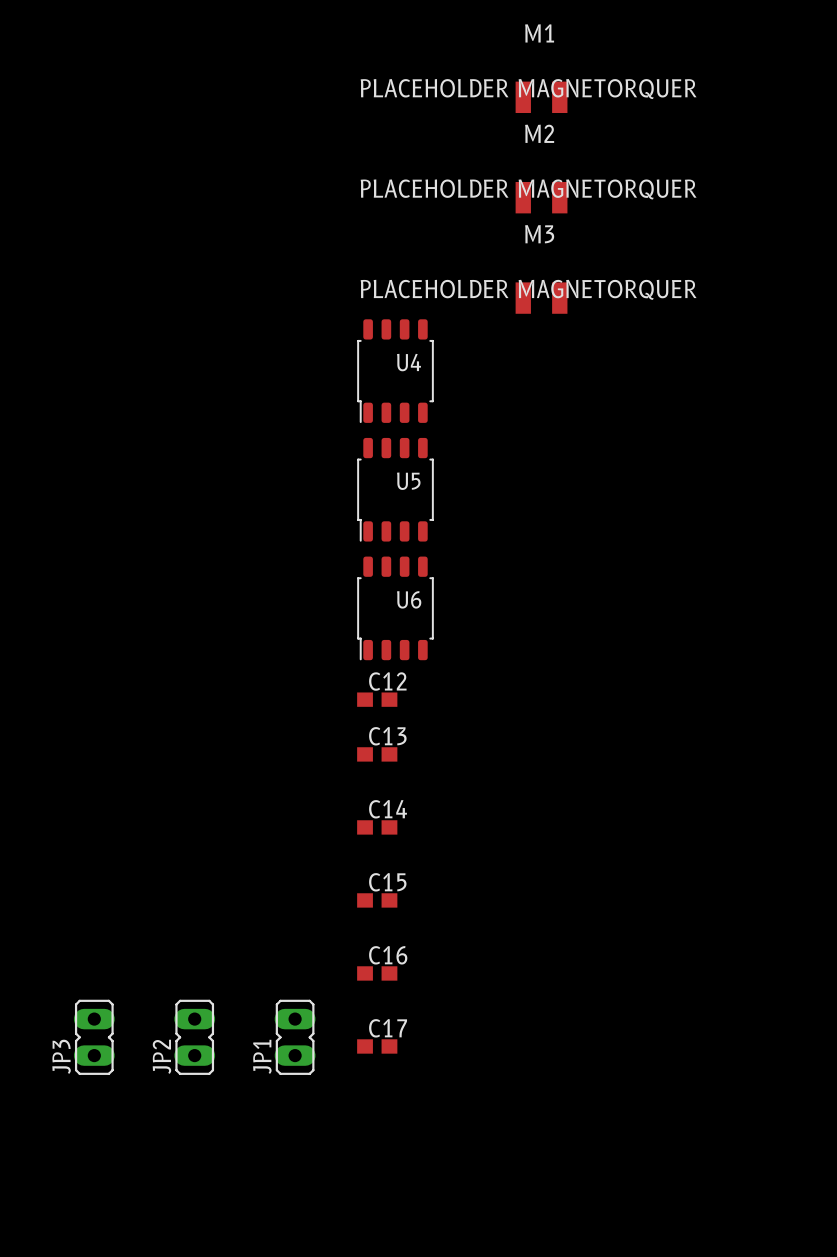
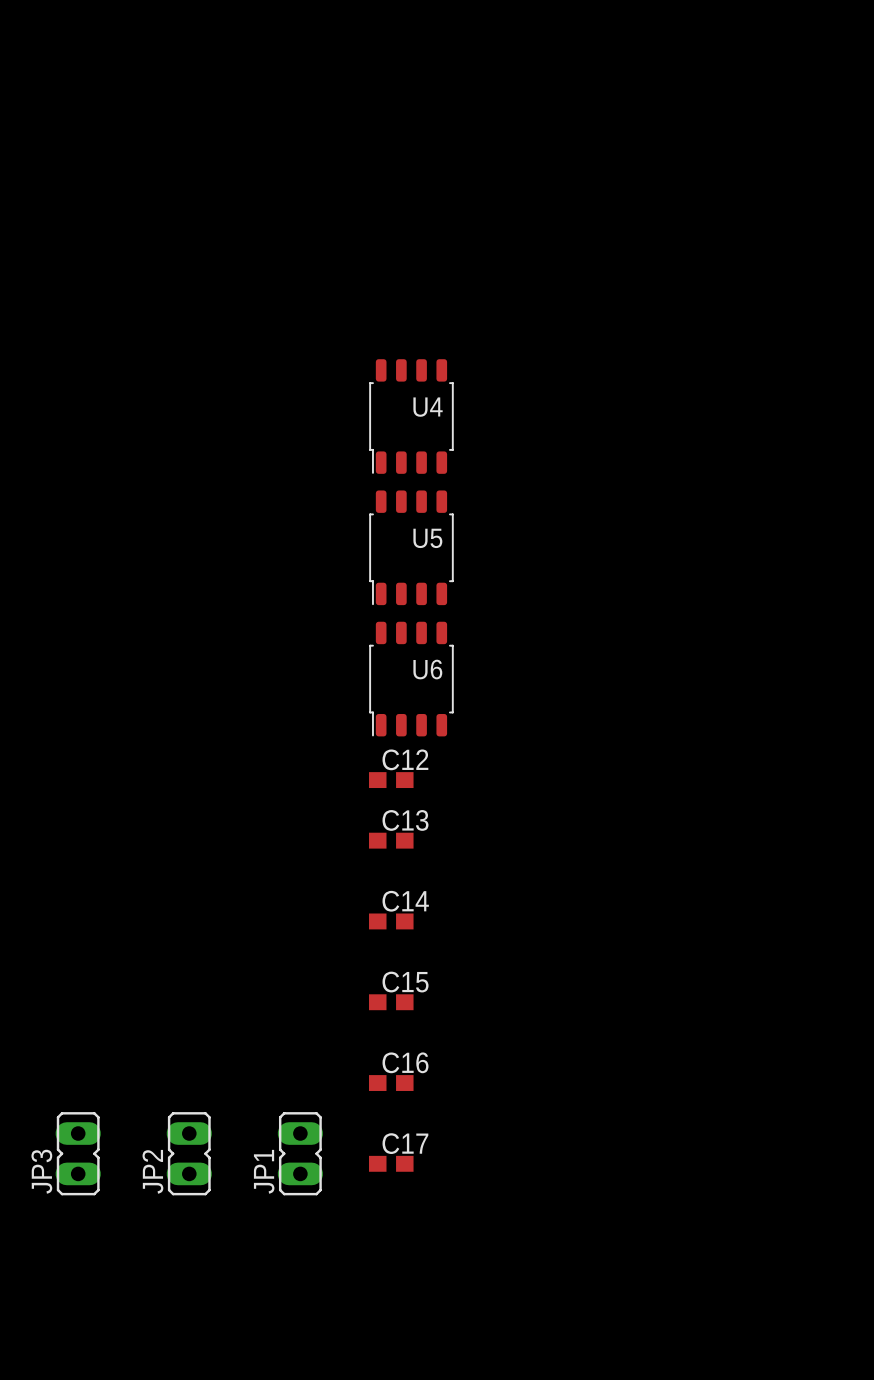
M1: (541, 97) -> none
M2: (541, 197) -> none
M3: (541, 298) -> none

